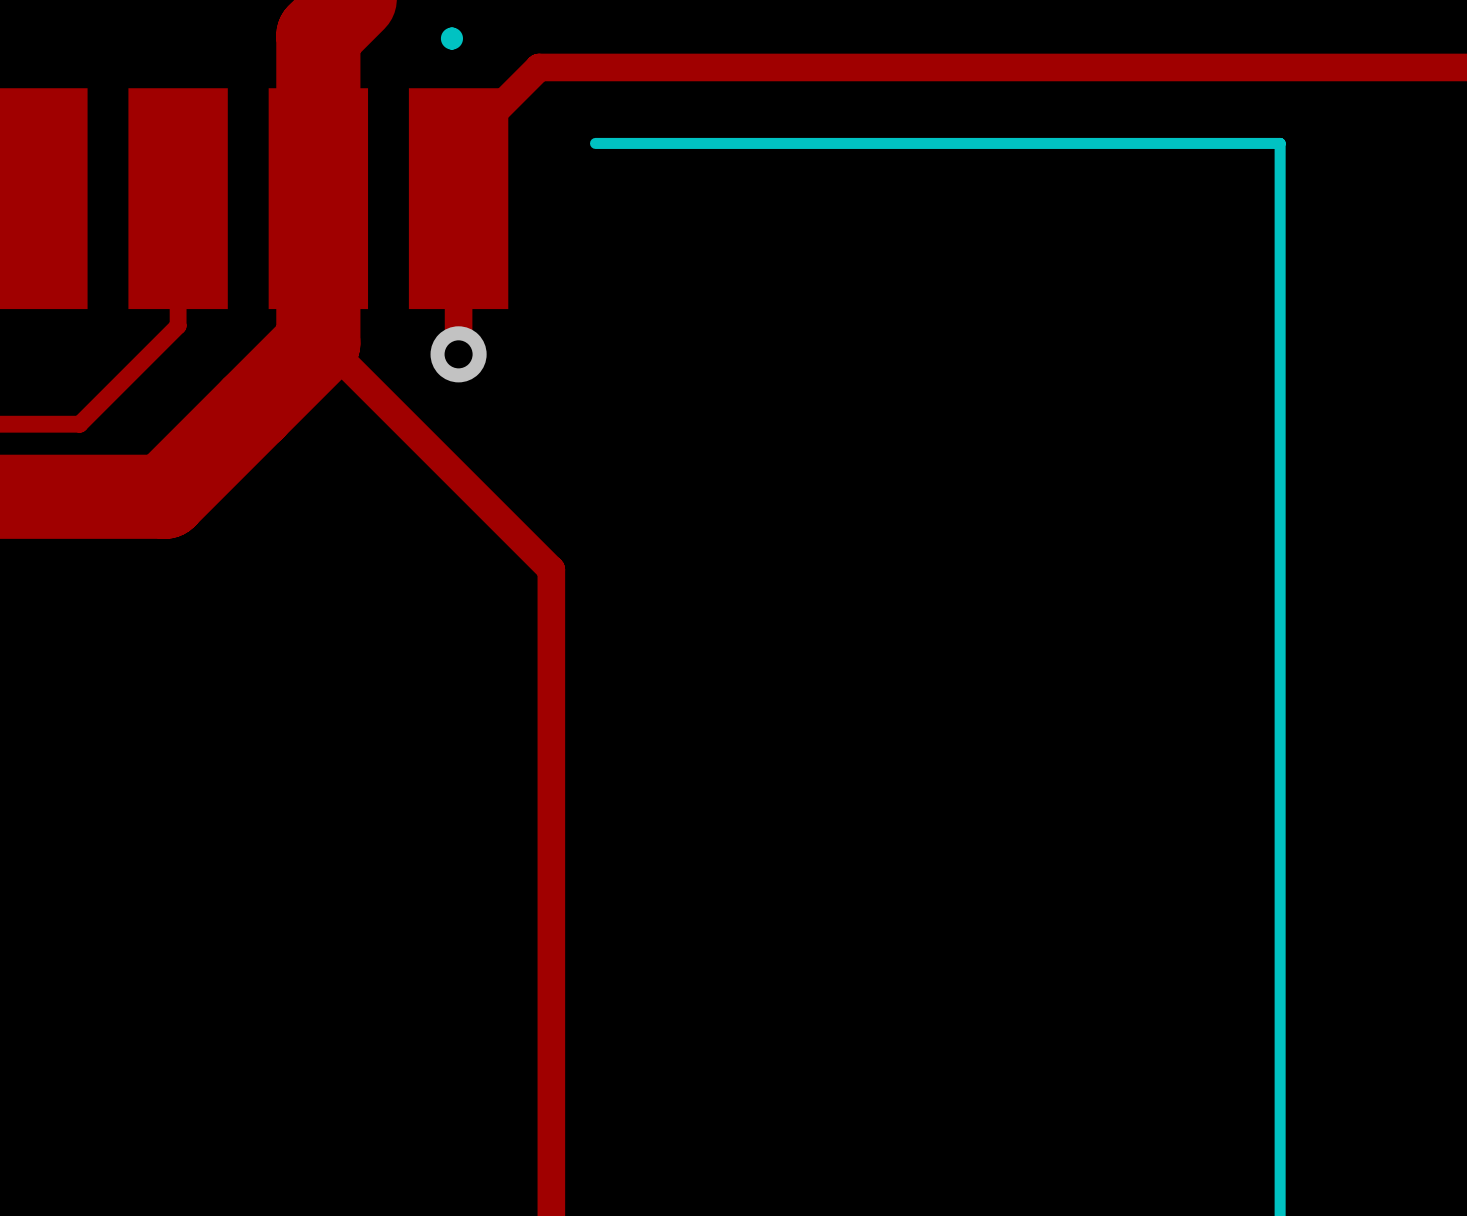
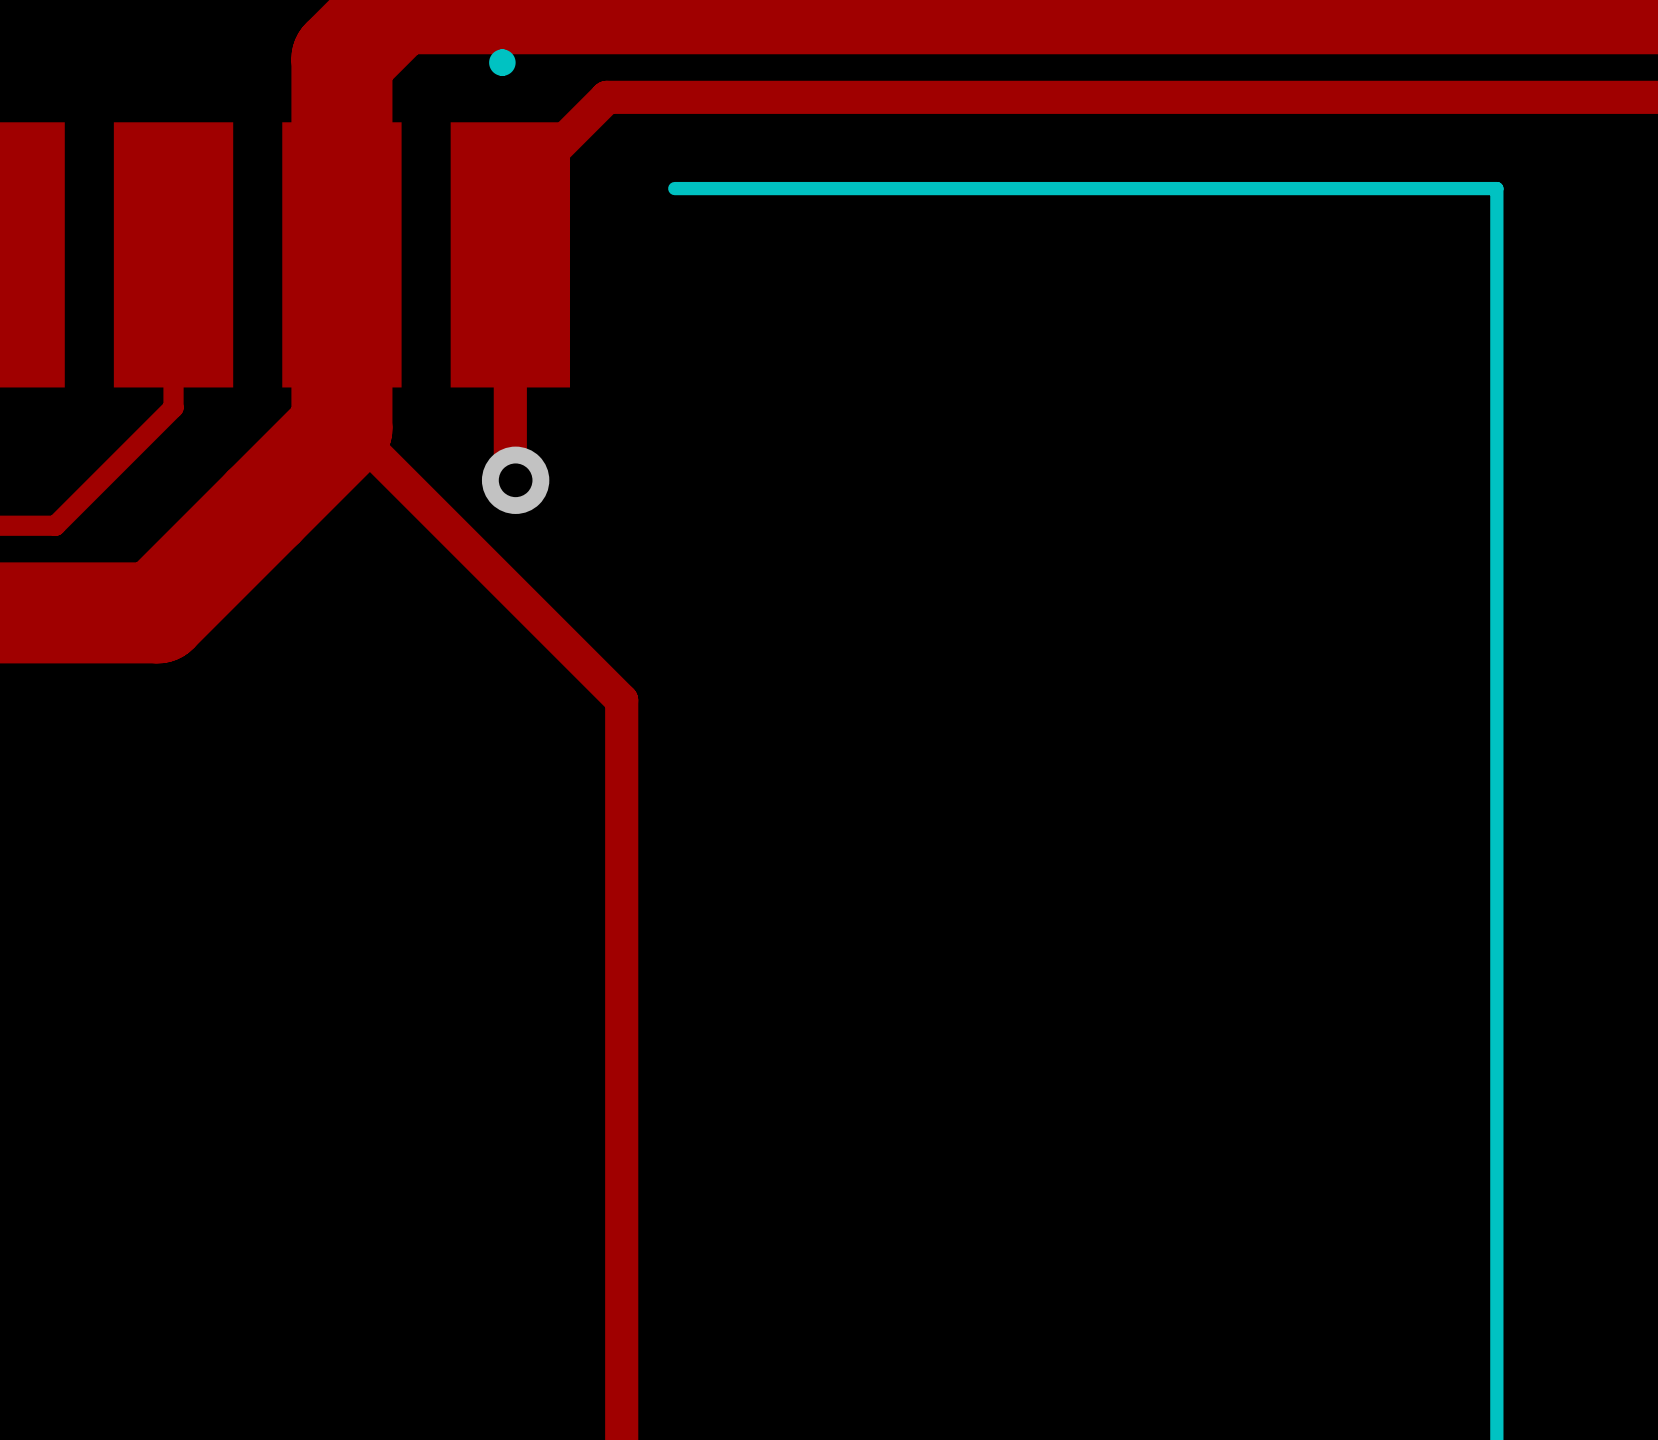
via position: (458, 354) -> (515, 480)

